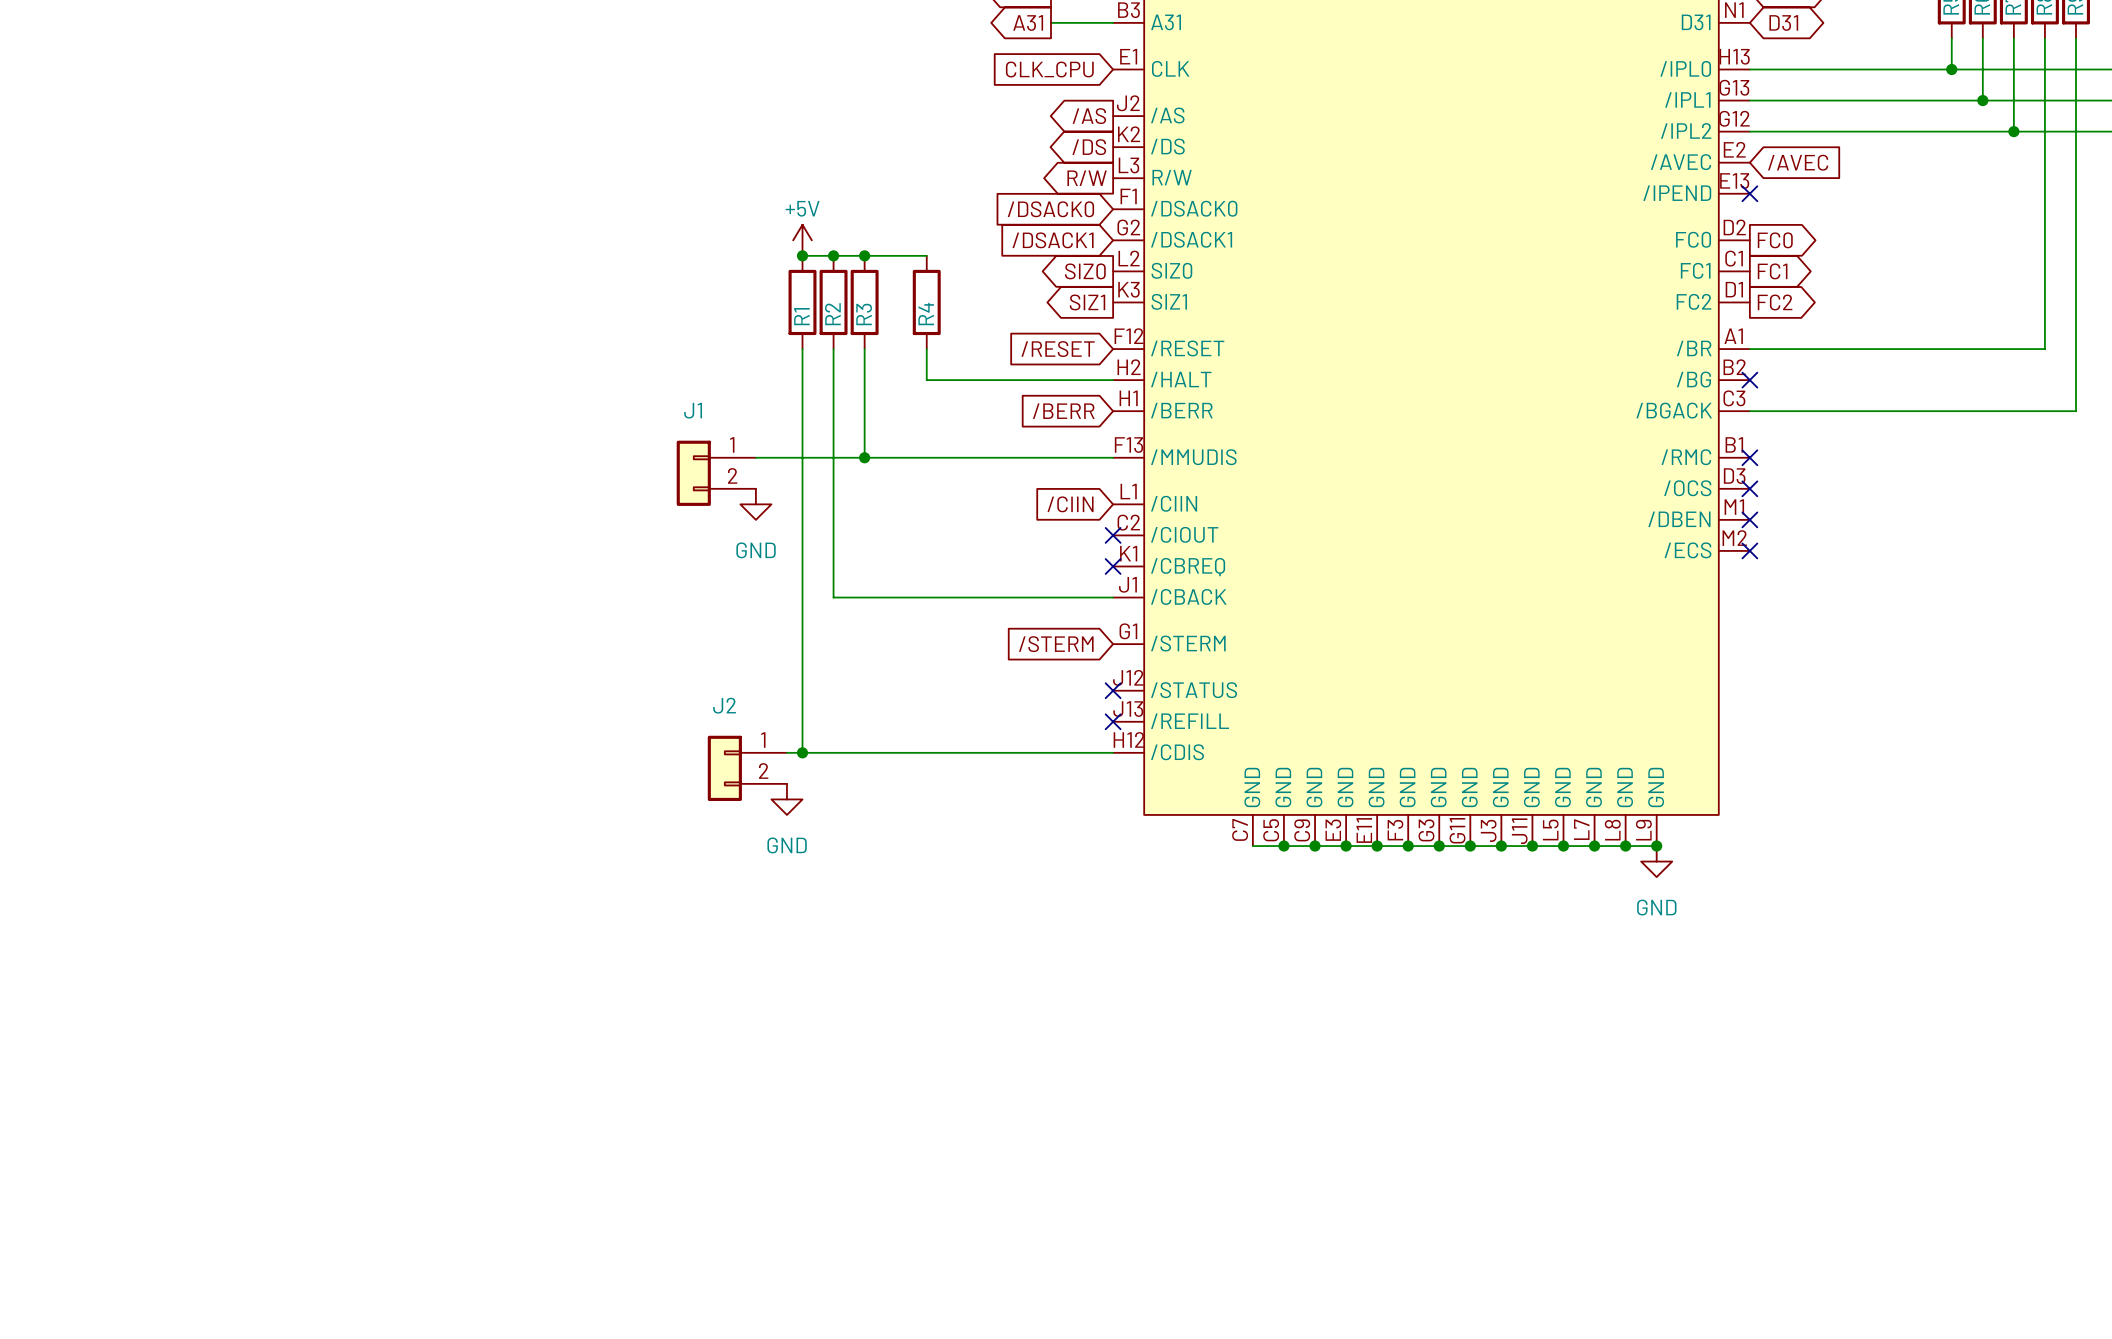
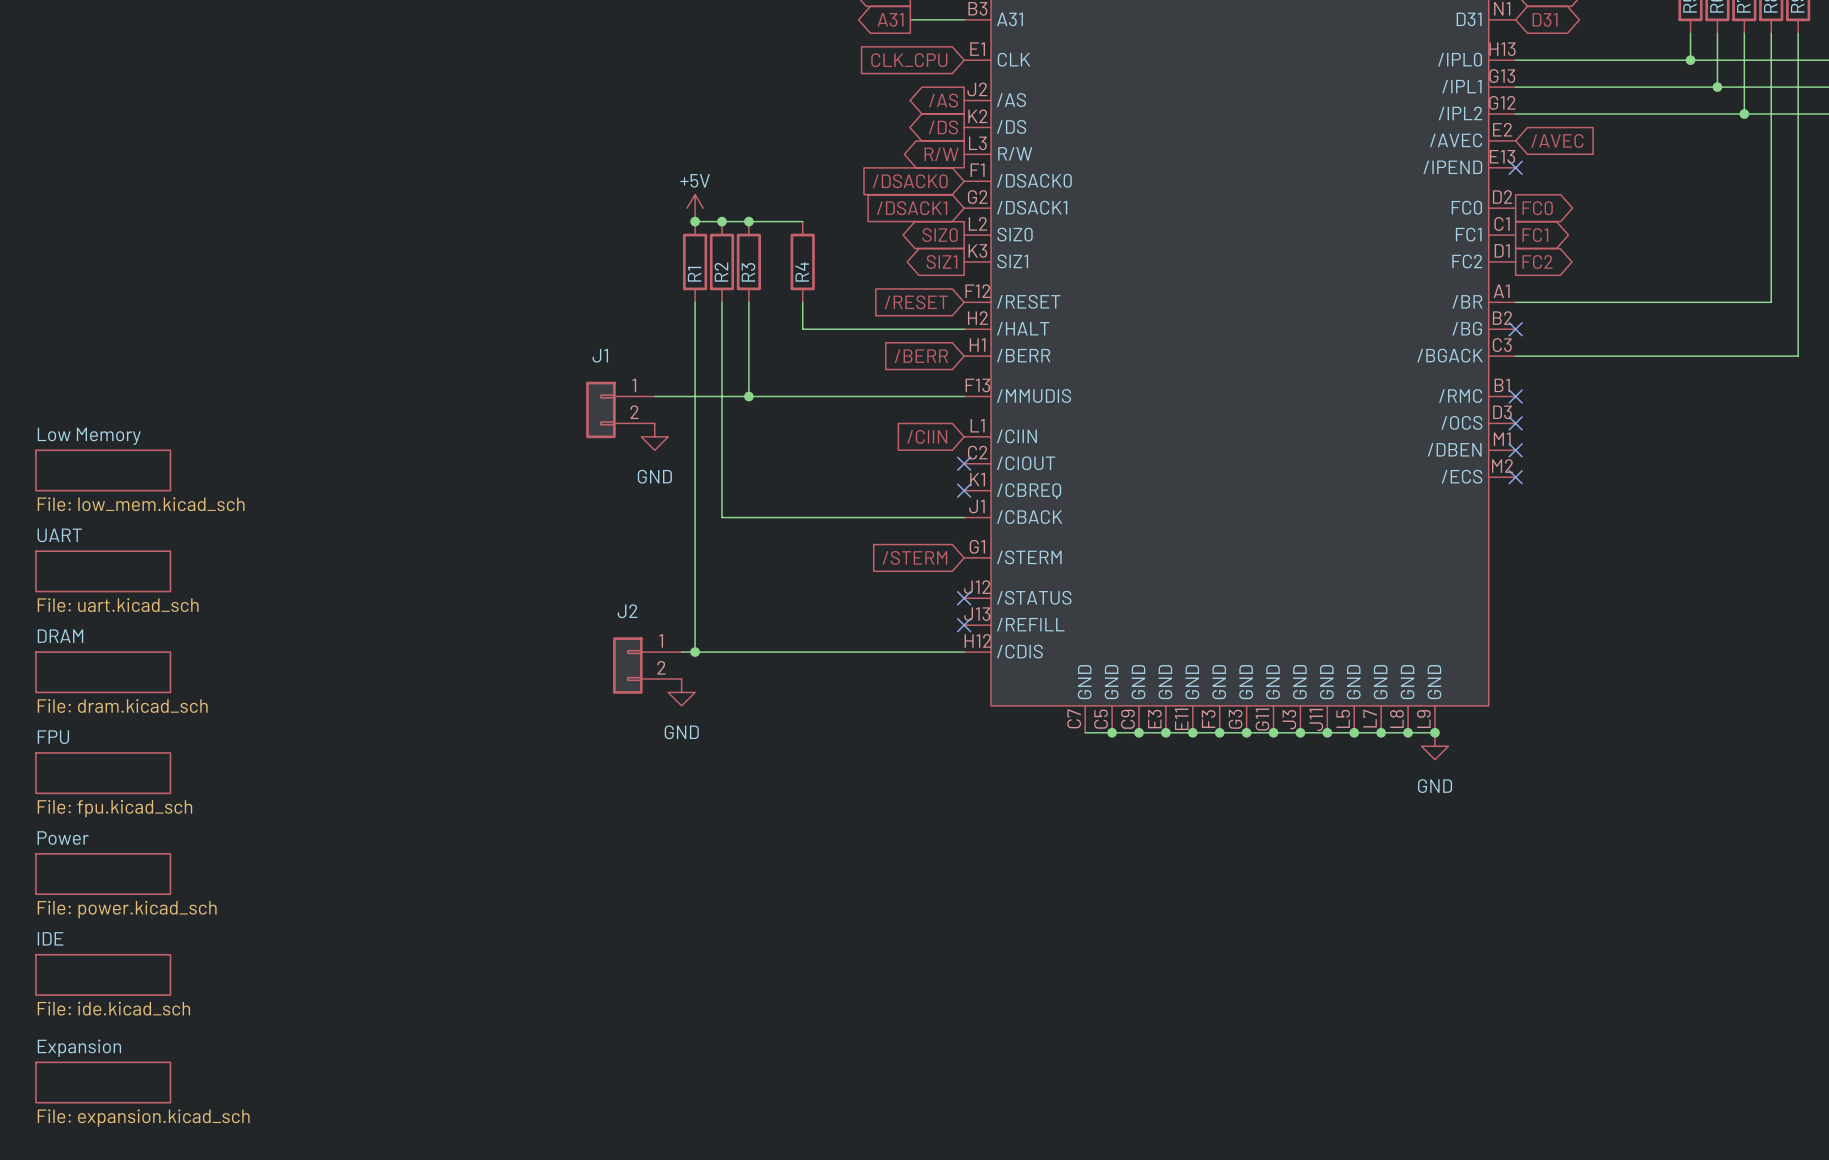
sheet Low Memory: none -> File: low_mem.kicad_sch (103, 470)
sheet UART: none -> File: uart.kicad_sch (103, 571)
sheet DRAM: none -> File: dram.kicad_sch (103, 672)
sheet FPU: none -> File: fpu.kicad_sch (103, 773)
sheet Power: none -> File: power.kicad_sch (103, 874)
sheet IDE: none -> File: ide.kicad_sch (103, 974)
sheet Expansion: none -> File: expansion.kicad_sch (103, 1082)

